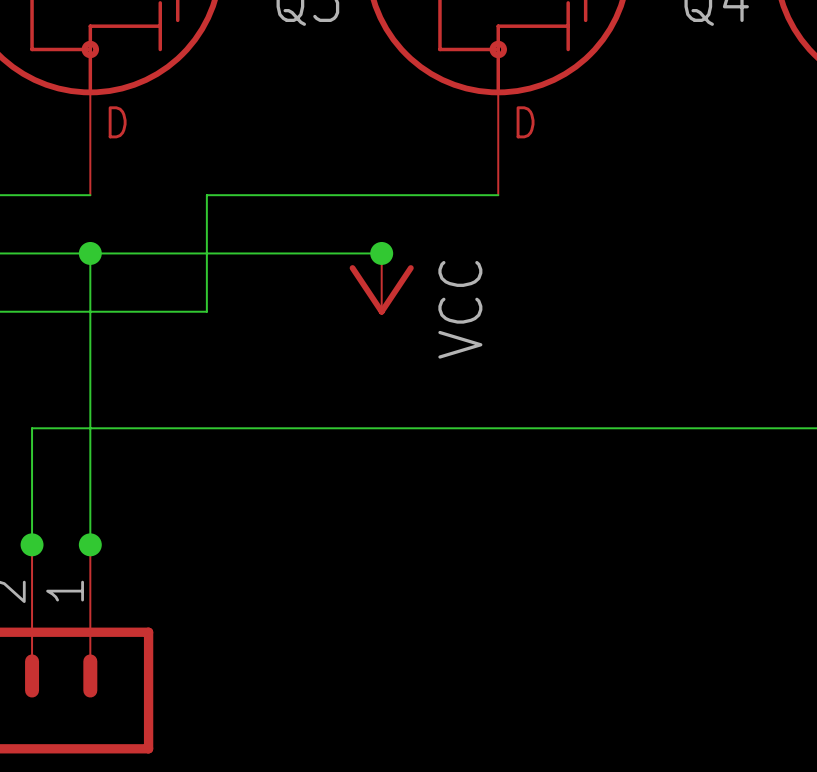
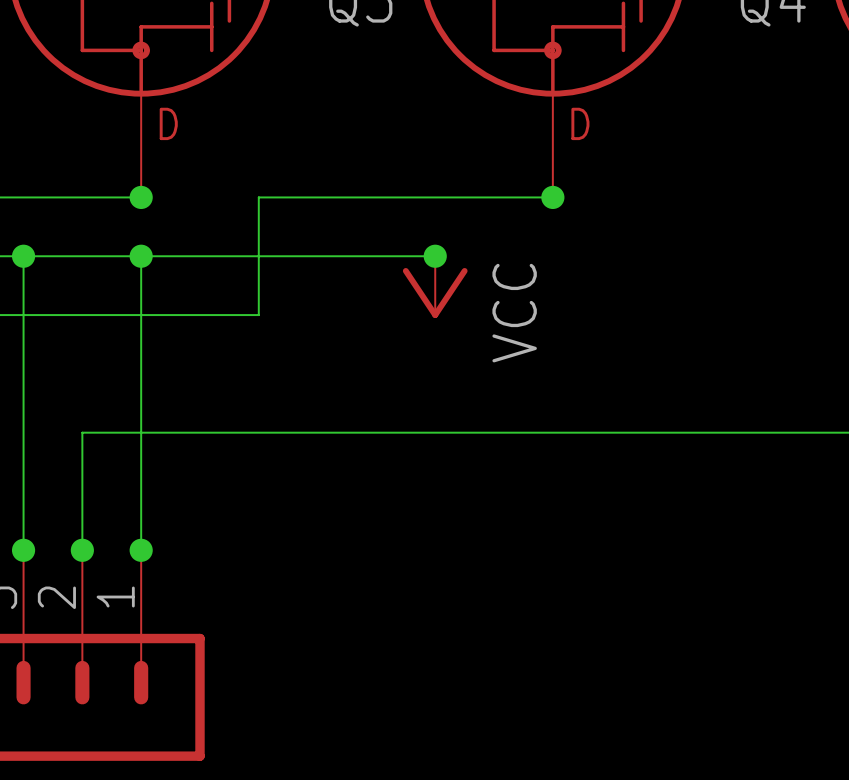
junction: none -> (141, 197)
junction: none -> (552, 197)

